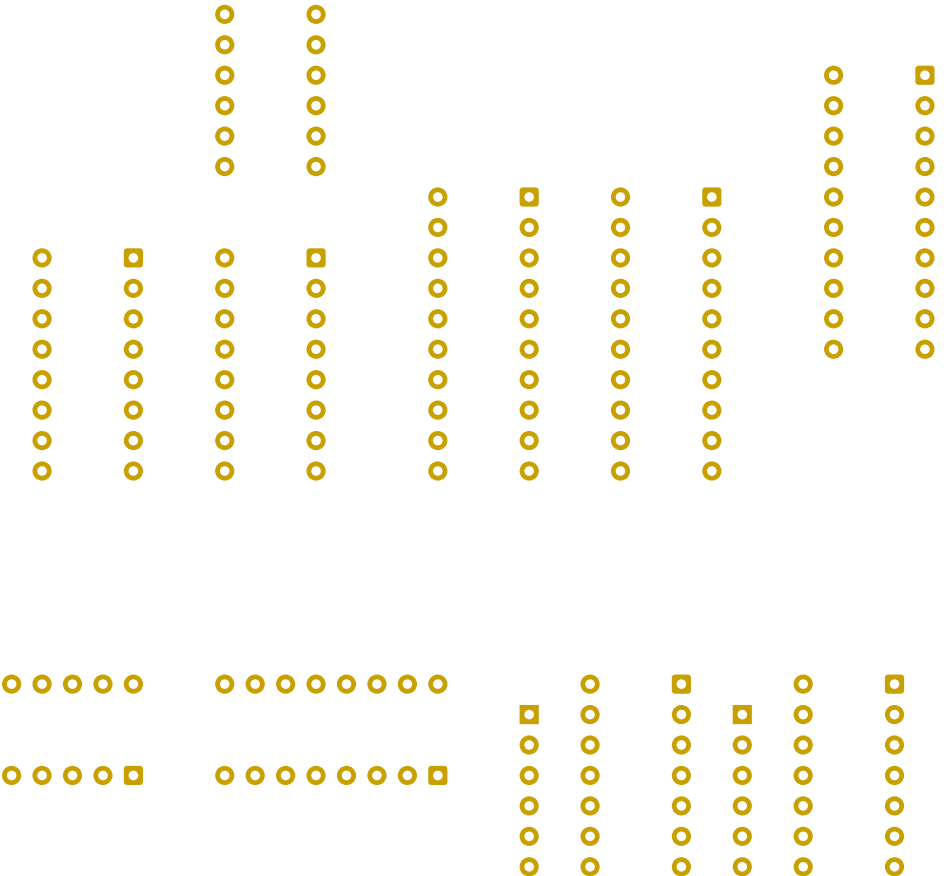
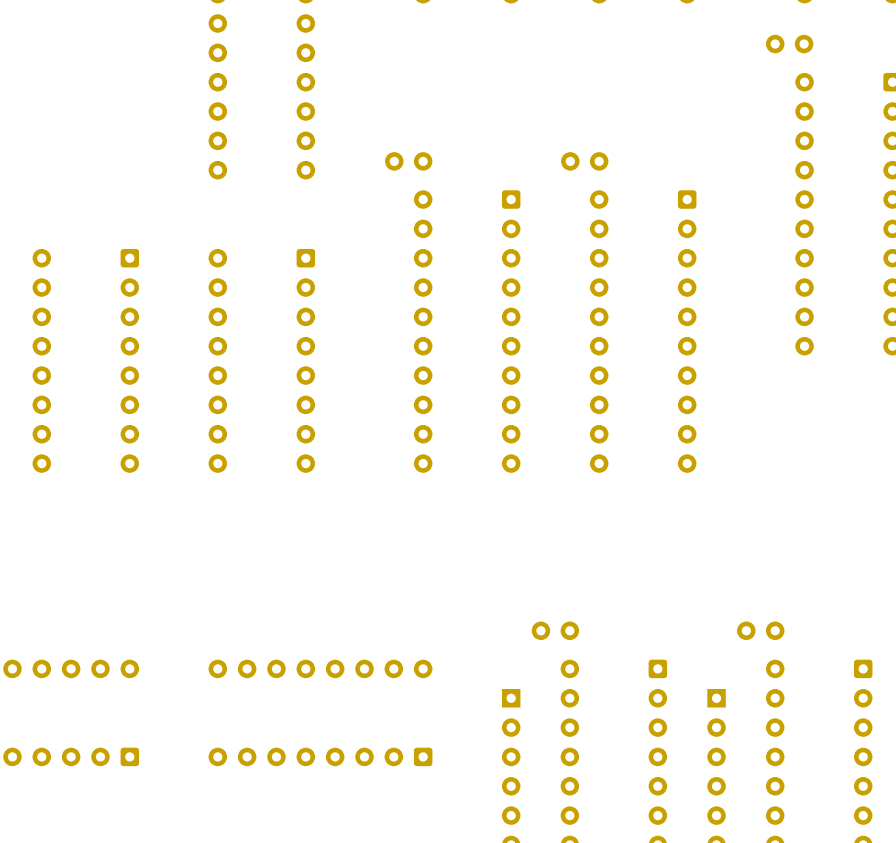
part: none -> (789, 44)
part: none -> (408, 161)
part: none -> (584, 161)
part: none -> (555, 630)
part: none -> (760, 630)

